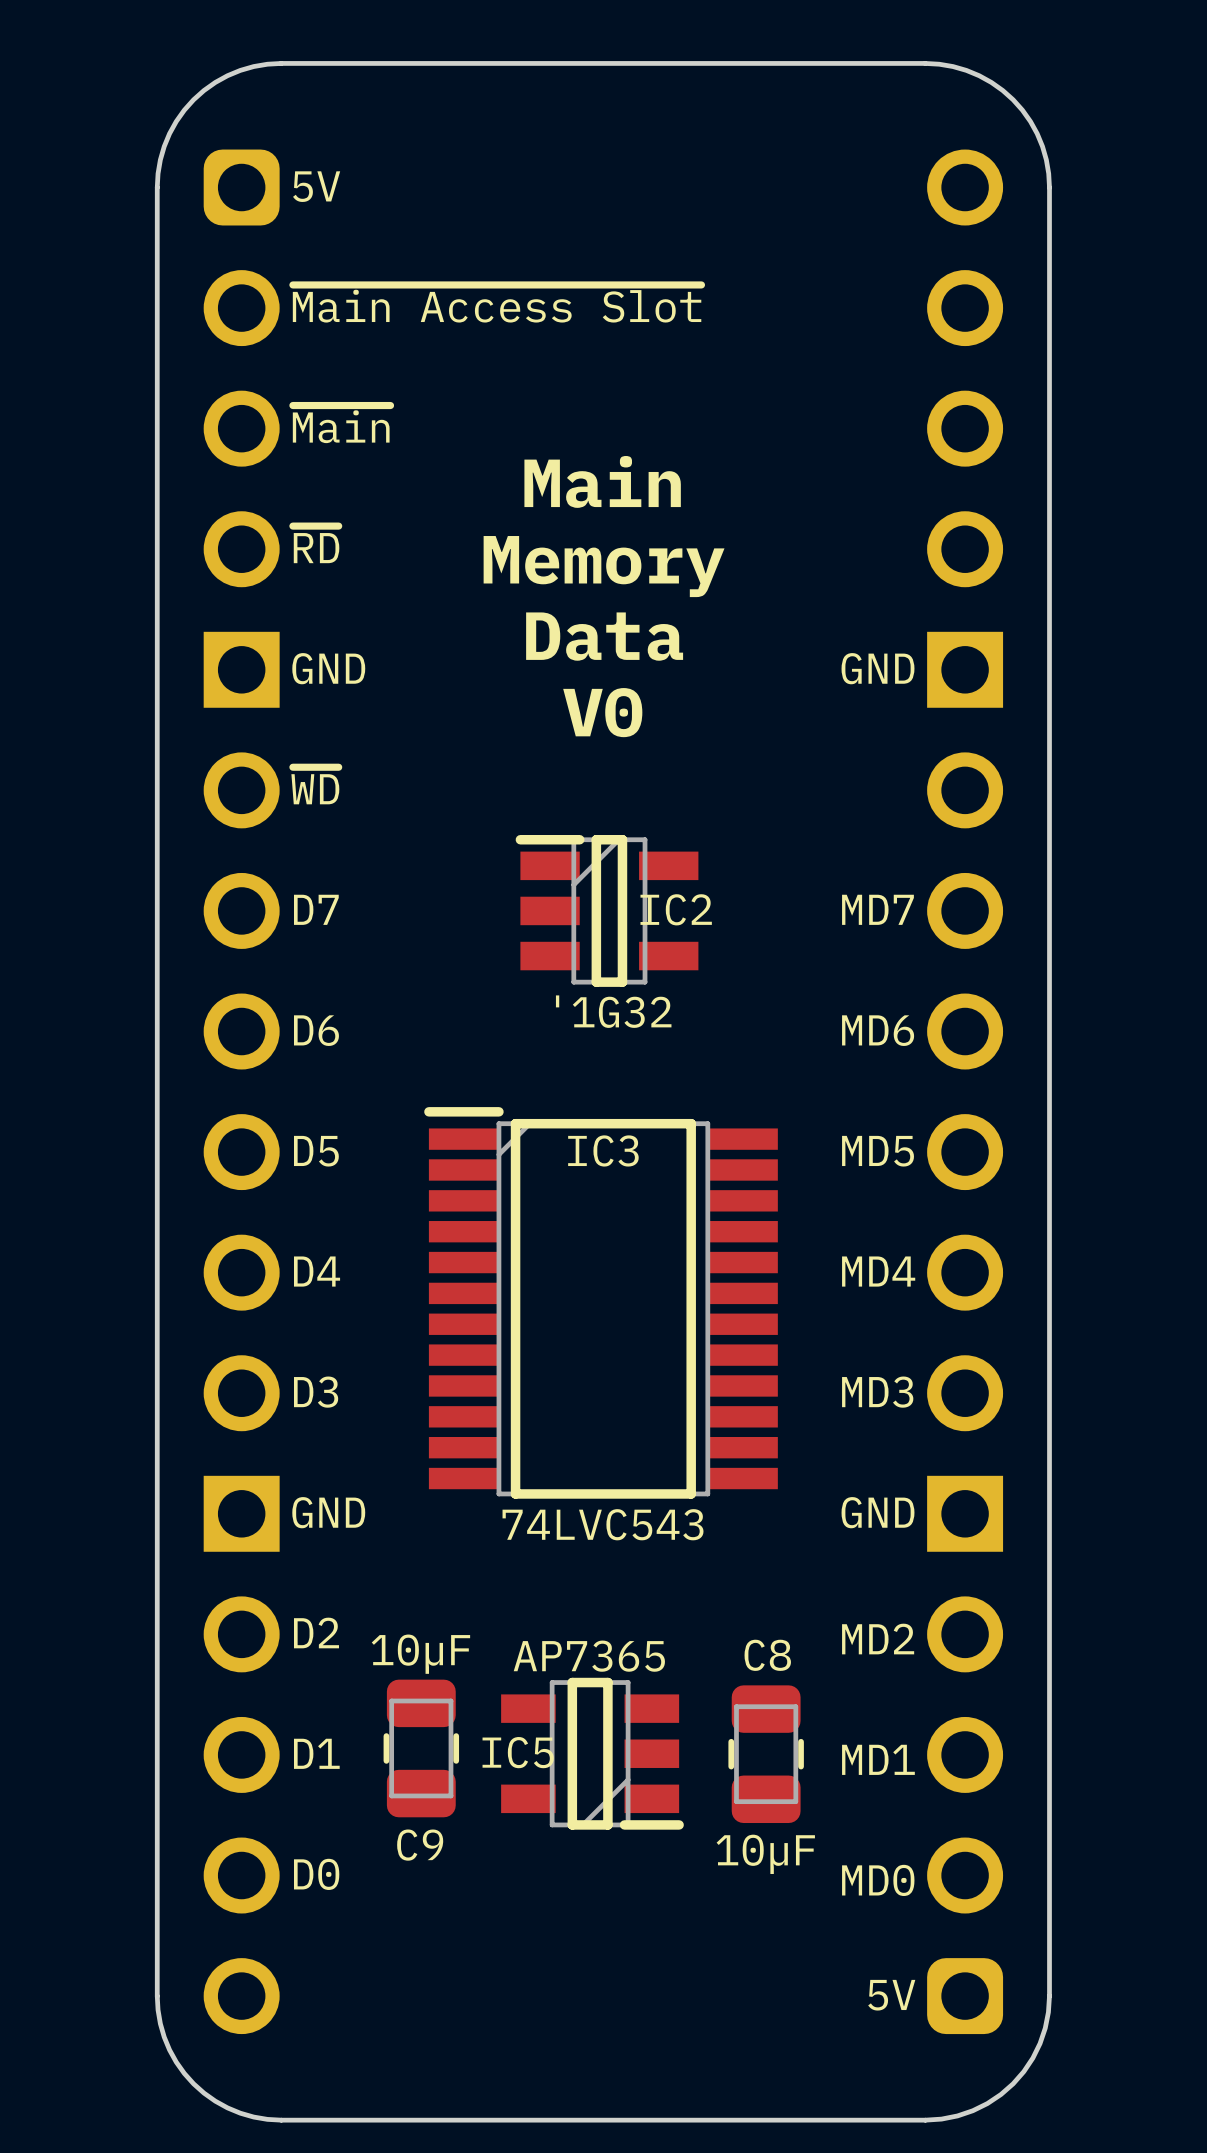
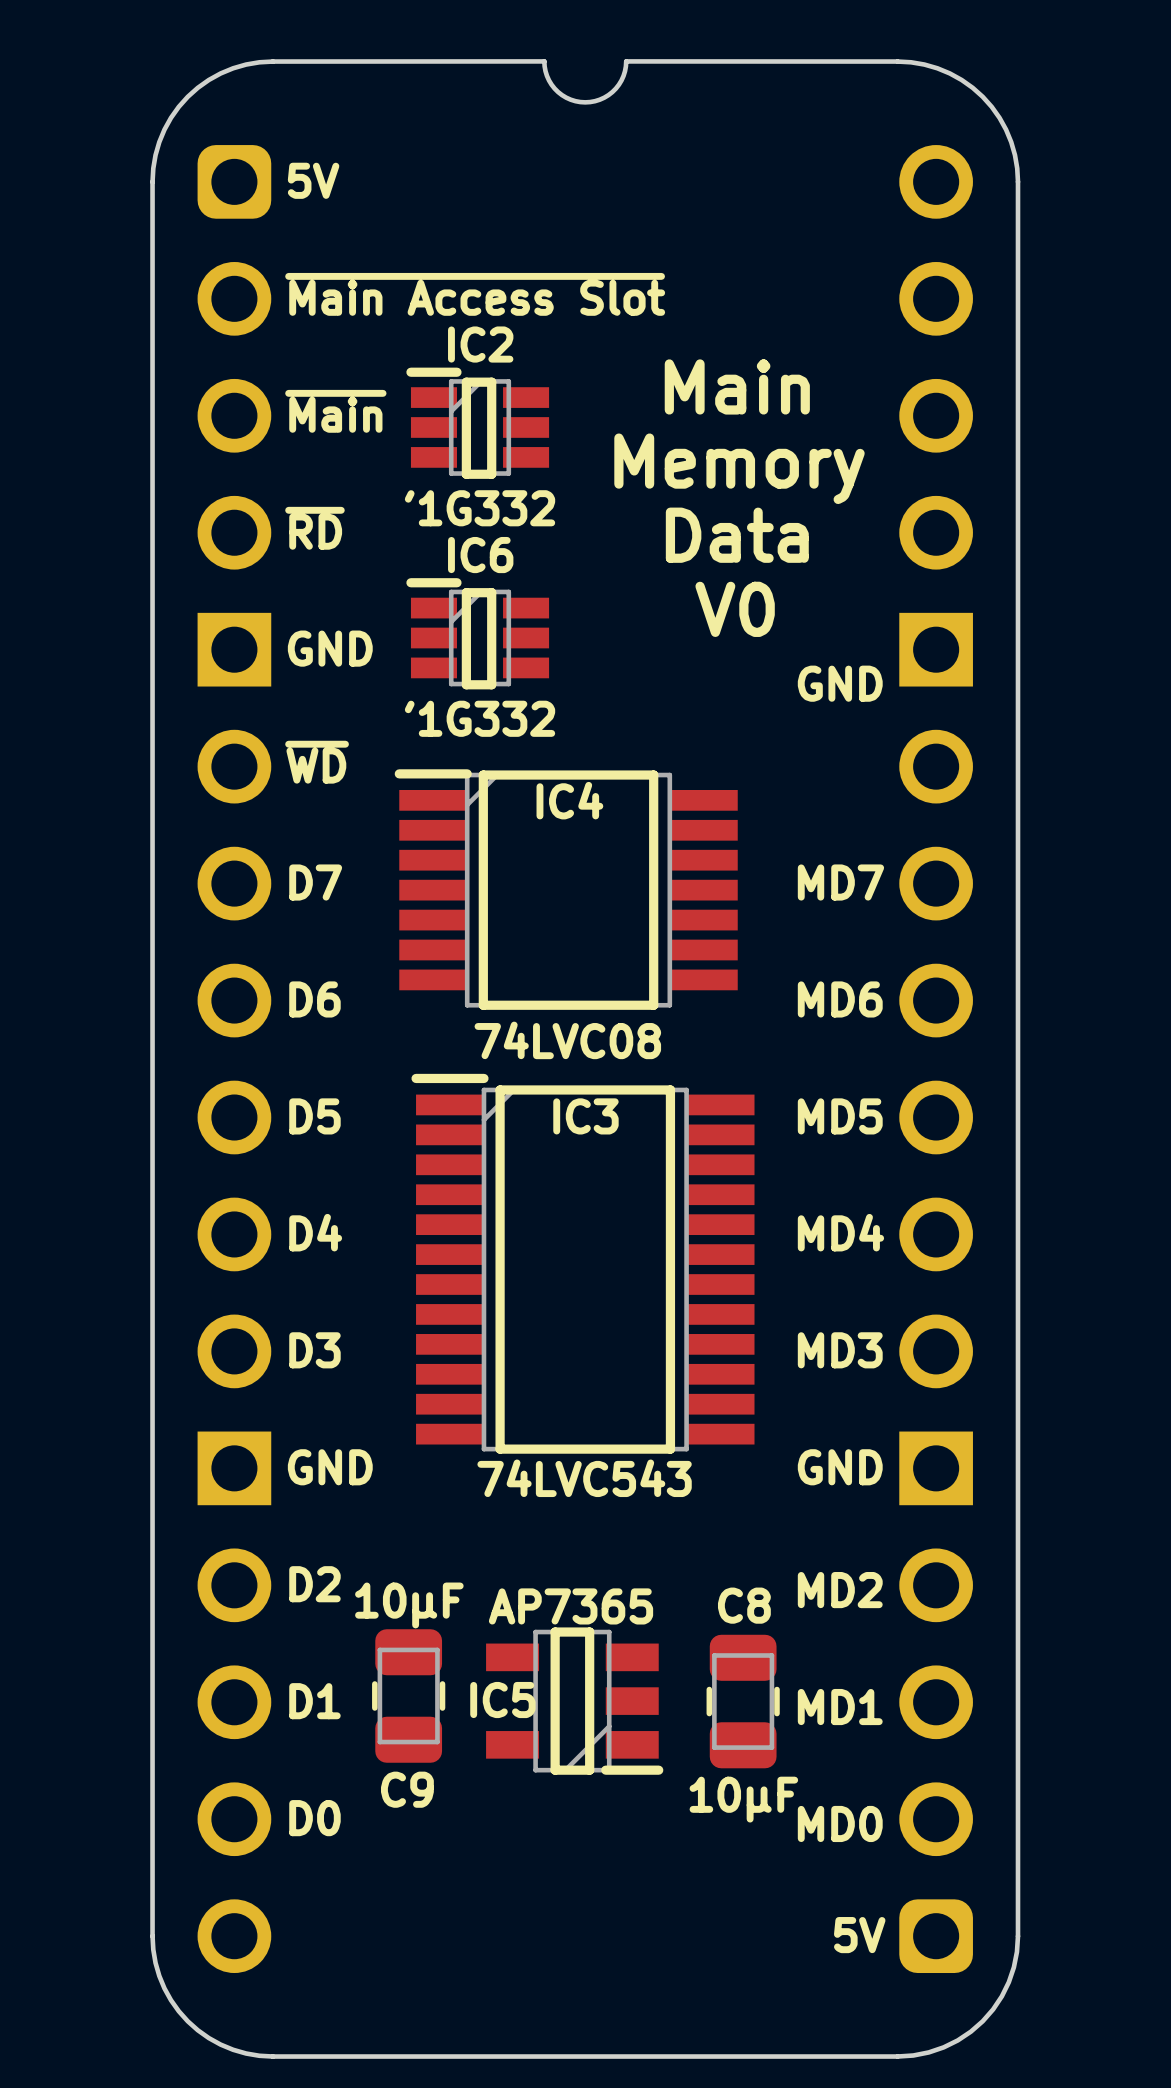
part footprint: [154, 61, 1052, 2123] -> [150, 59, 1021, 2059]
text position: Main (602, 481) -> Main (737, 386)
text position: Memory (604, 566) -> Memory (739, 468)
text position: Data (604, 636) -> Data (737, 535)
IC6: none -> (477, 633)
text position: GND (877, 668) -> GND (840, 683)
text position: V0 (602, 712) -> V0 (735, 609)
IC2 footprint: [515, 834, 699, 987] -> [406, 367, 550, 479]
IC2 name position: IC2 (676, 909) -> IC2 (480, 344)
IC4: none -> (566, 889)

